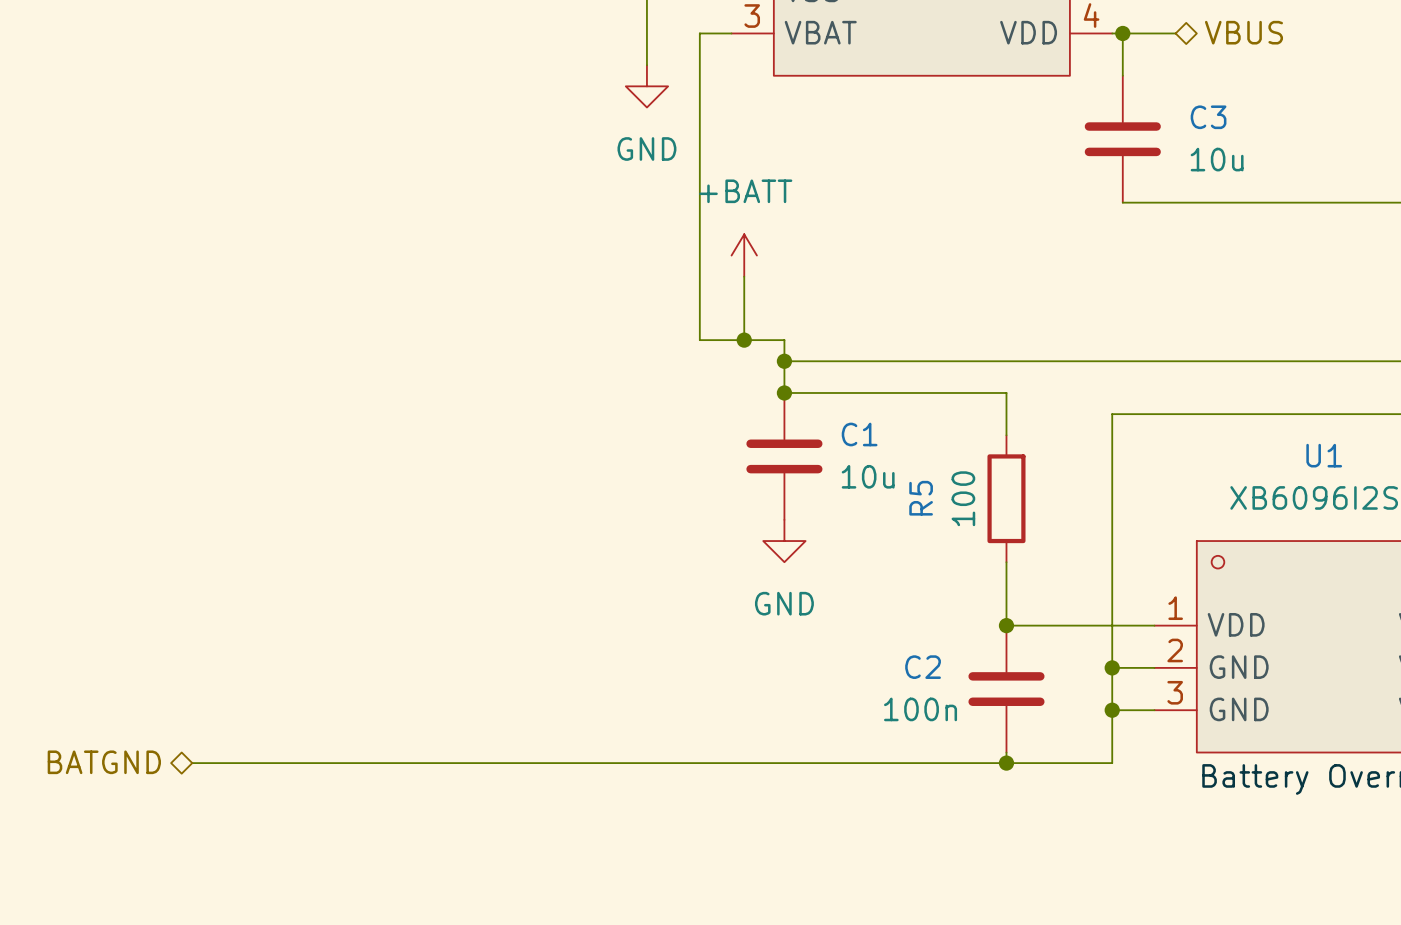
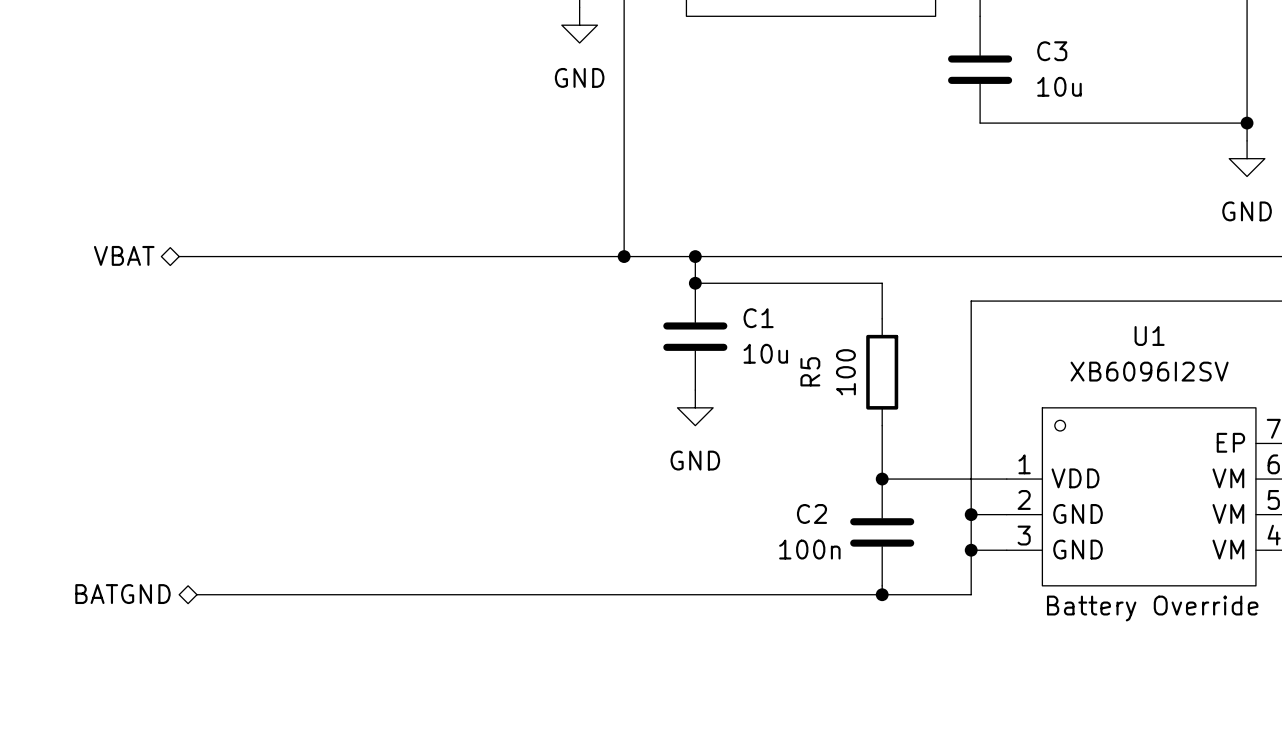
power symbol: +BATT (744, 255) -> none
wire: (744, 276) (744, 340) -> none
wire: (699, 340) (784, 340) (784, 361) -> (624, 238) (624, 256)
junction position: (744, 340) -> (624, 256)
hierarchical label: none -> VBAT (124, 255)
wire: none -> (179, 256) (695, 256)

